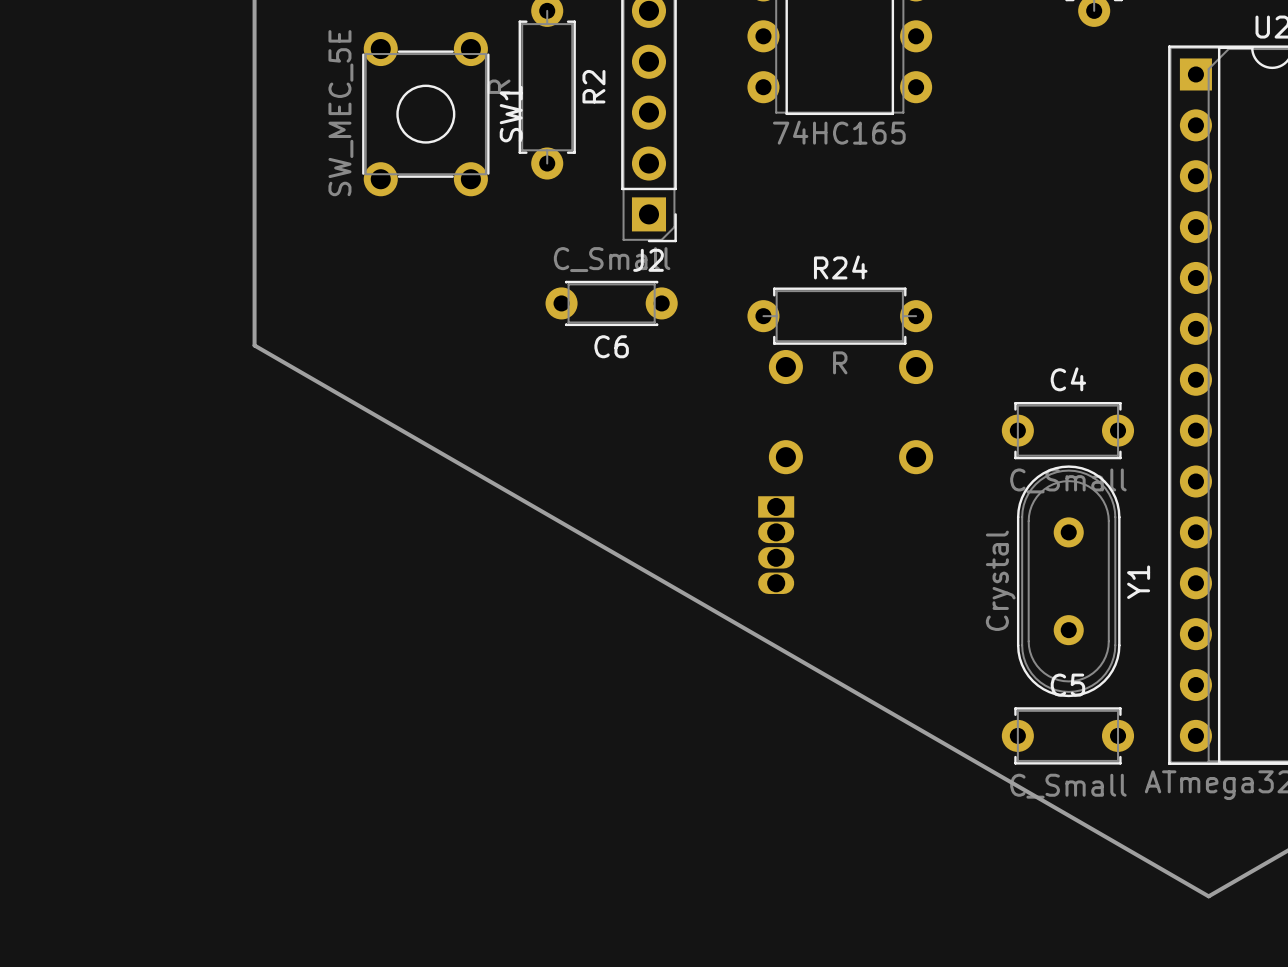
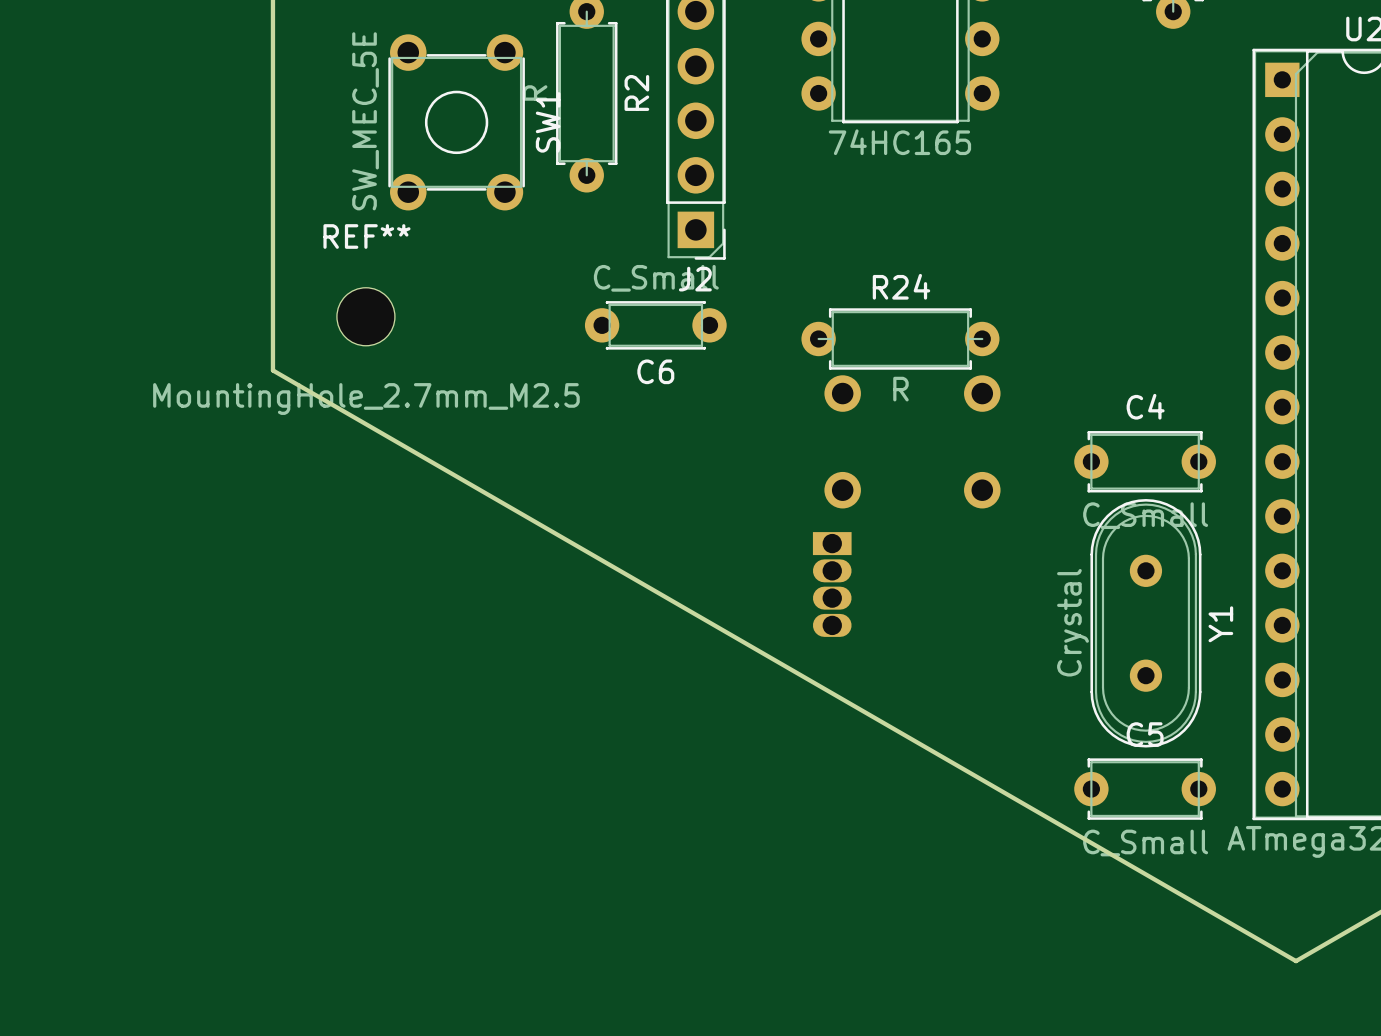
REF**: none -> MountingHole_2.7mm_M2.5 (365, 316)

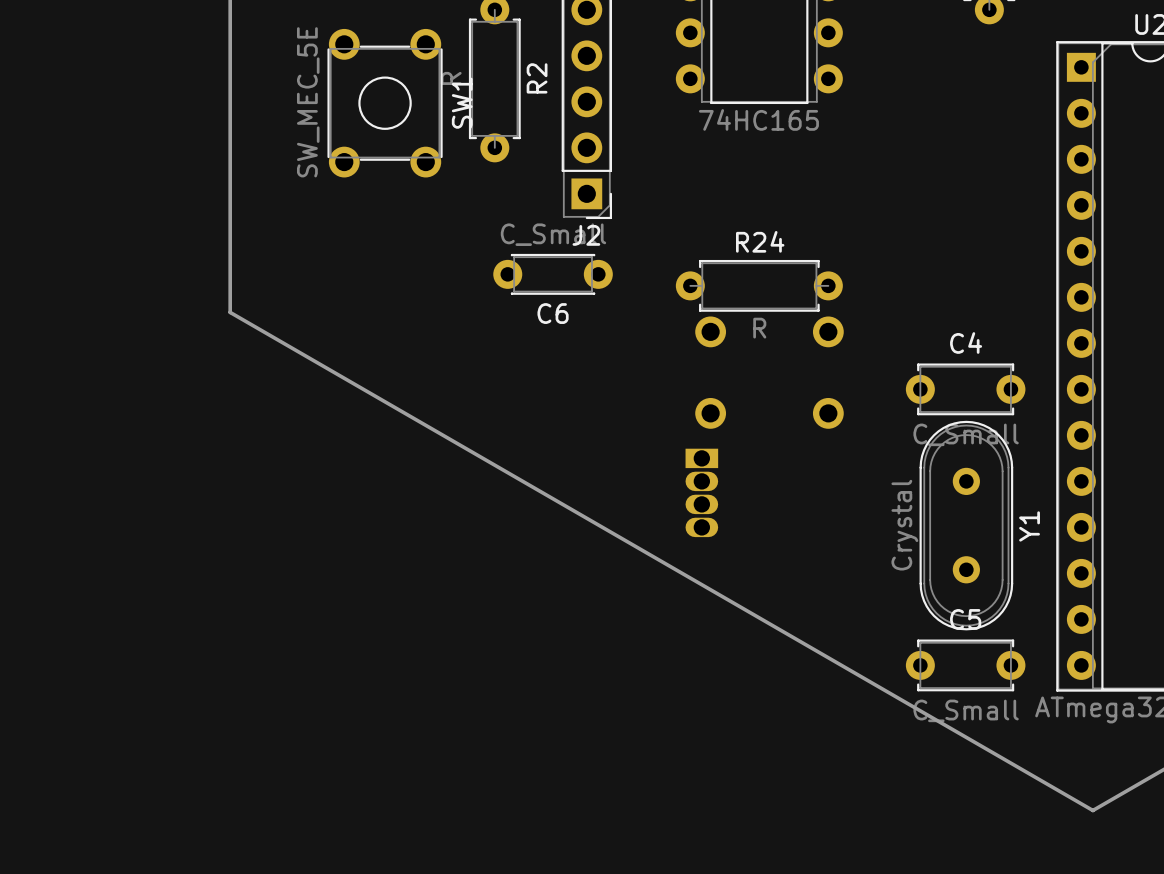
REF**: MountingHole_2.7mm_M2.5 (365, 316) -> none

